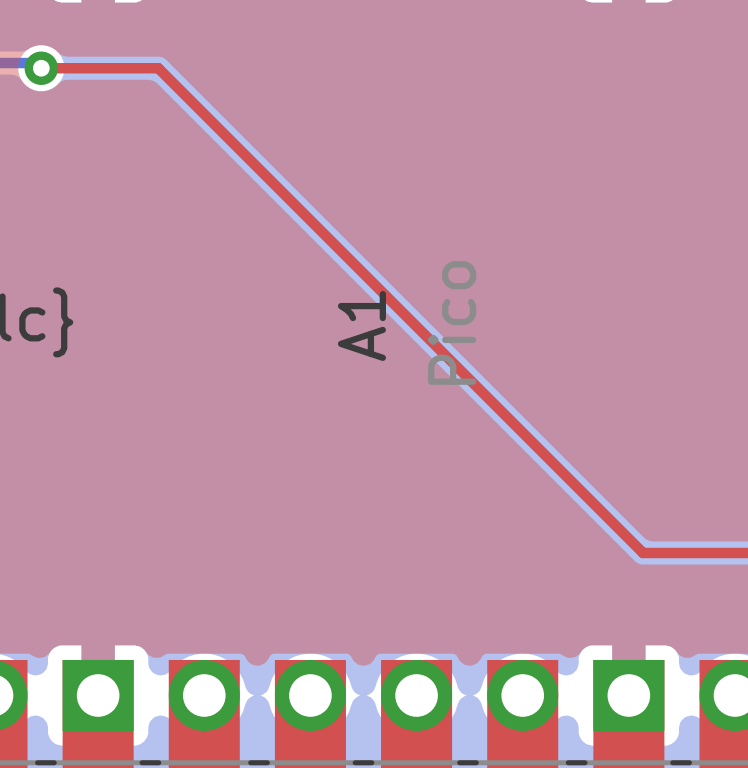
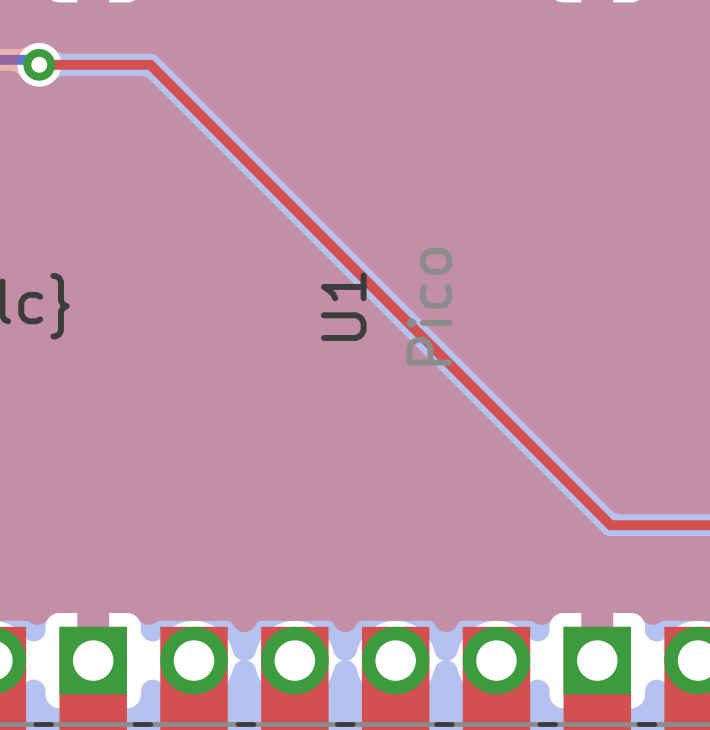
A1 name: A1 (361, 325) -> U1 (343, 306)

